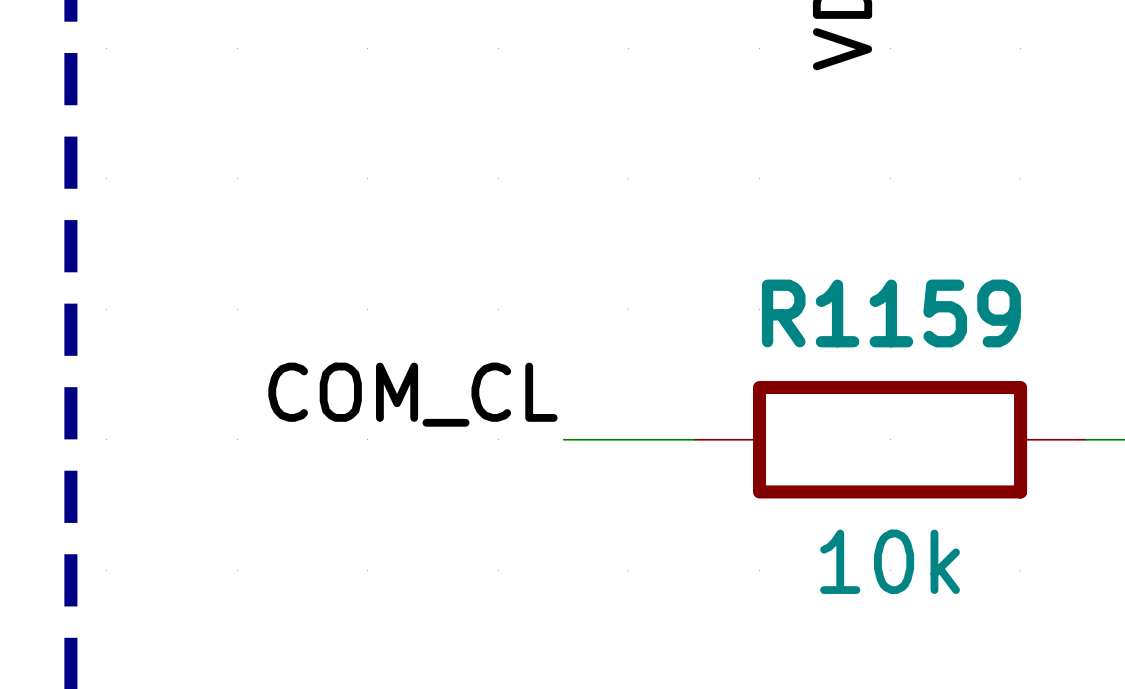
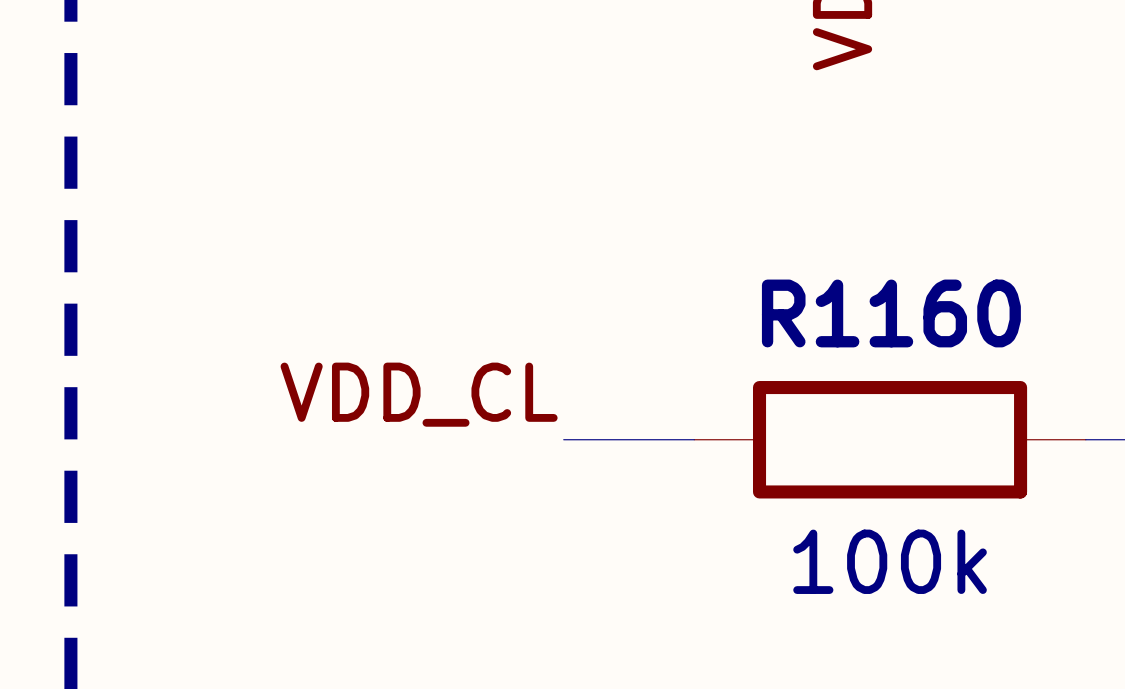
R1159 name: R1159 (891, 313) -> R1160 (891, 313)
label: COM_CL (412, 394) -> VDD_CL (419, 394)
R1159 value: 10k (890, 561) -> 100k (890, 561)

